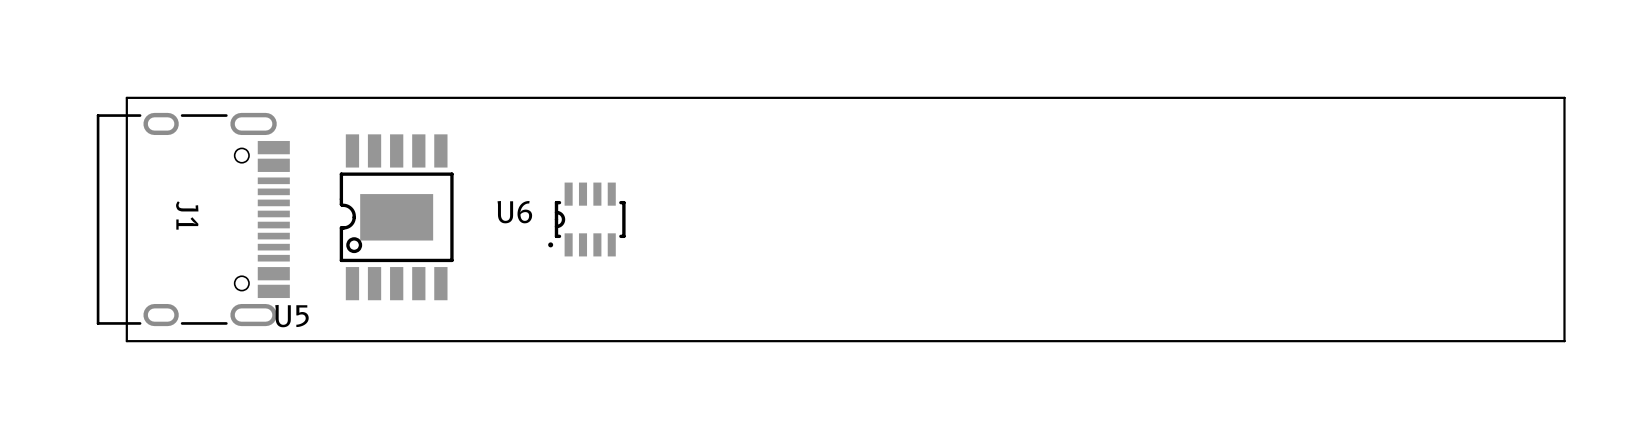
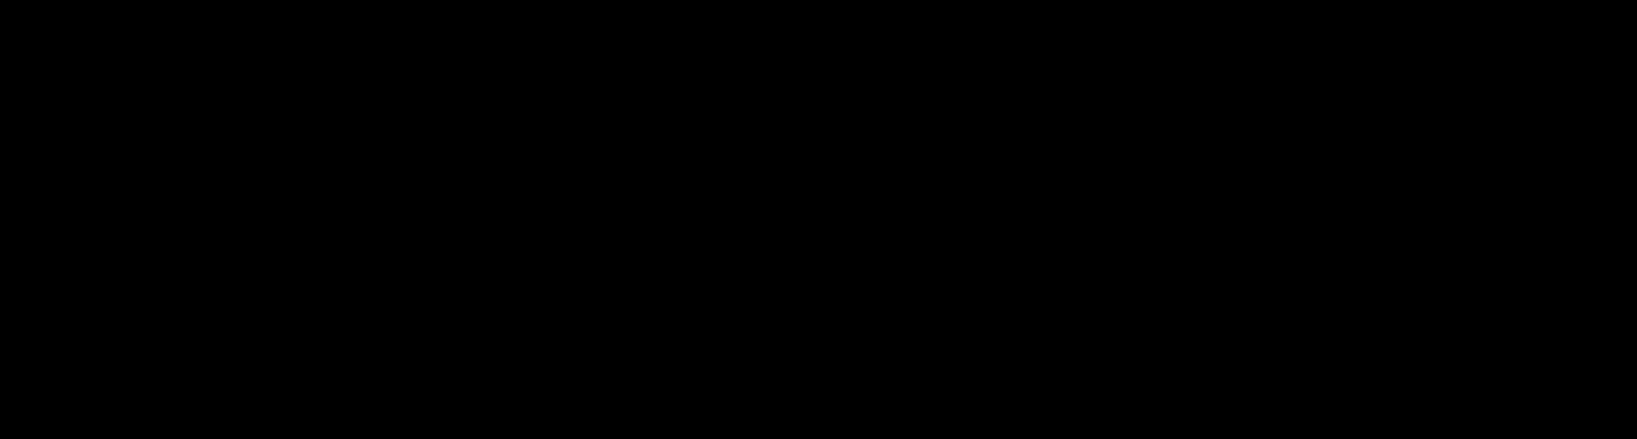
board edge: (1564, 97) (1564, 341) (126, 341) (126, 97) (1564, 97) -> none
U5: (396, 217) -> none
J1: (193, 219) -> none
U6: (586, 219) -> none

